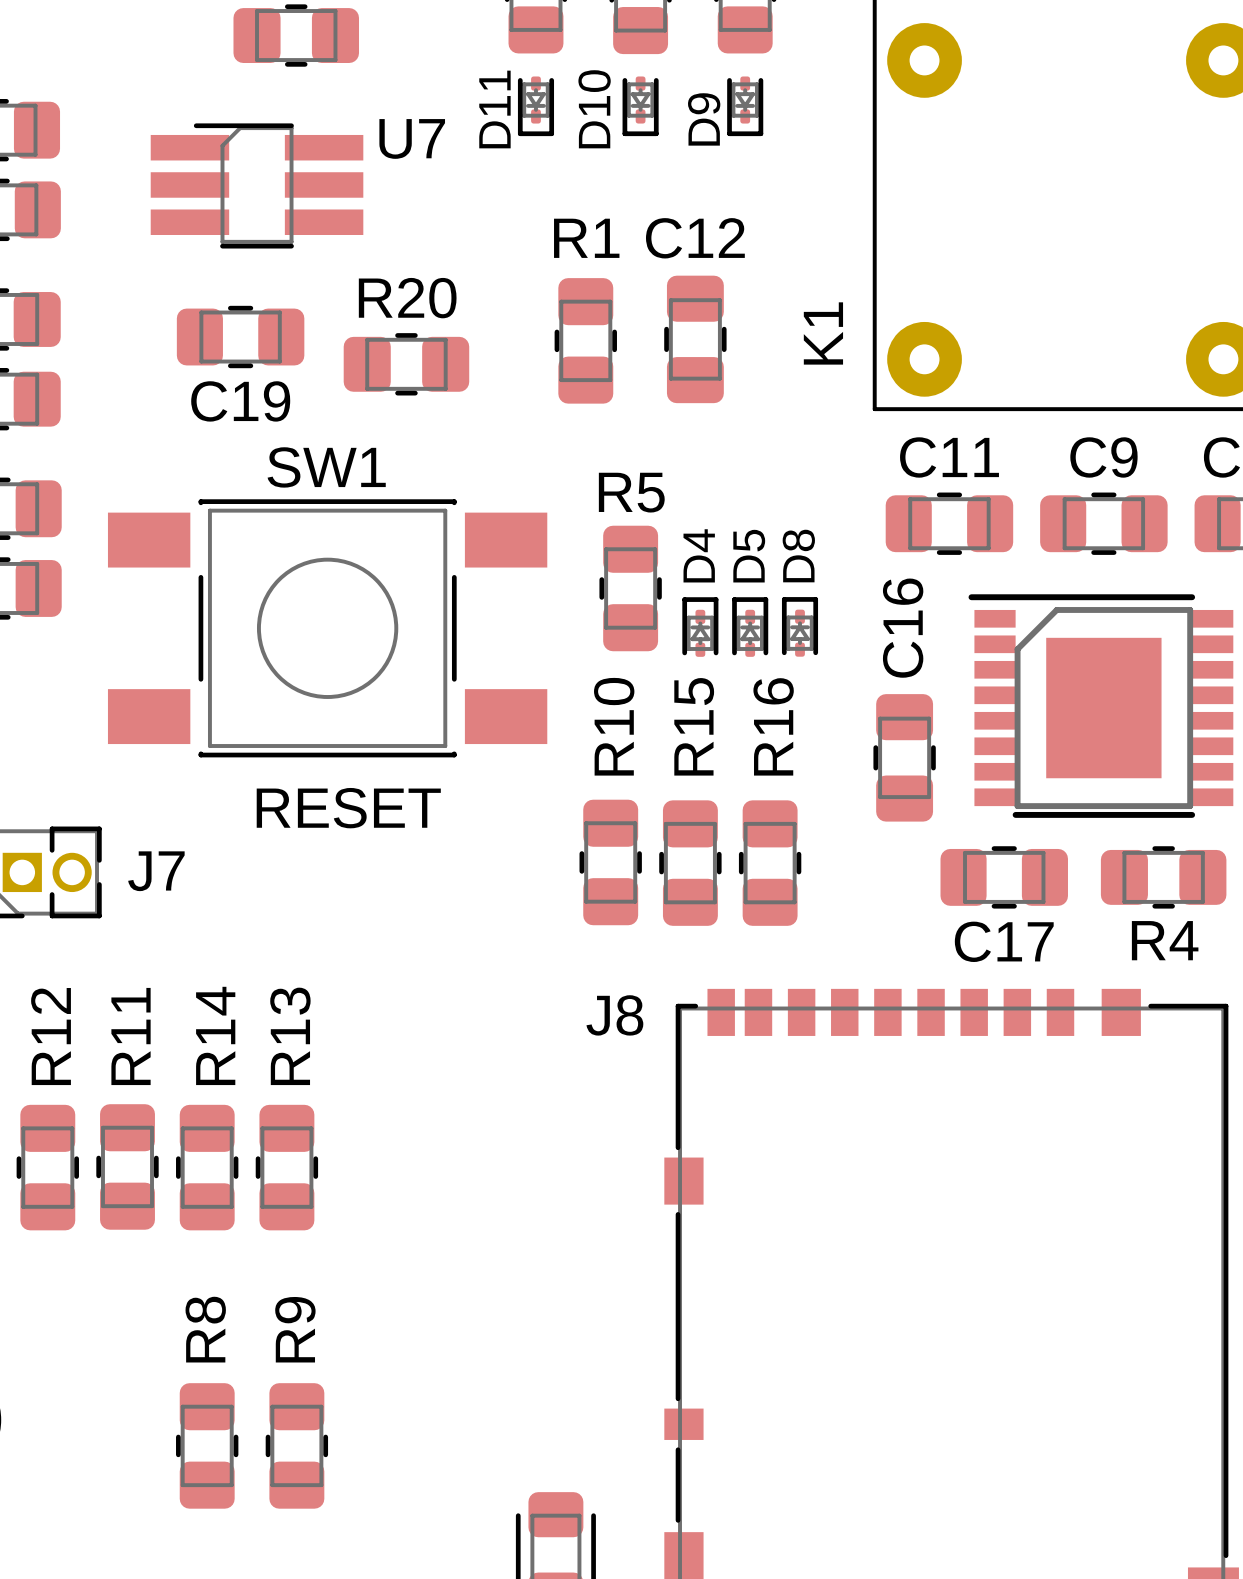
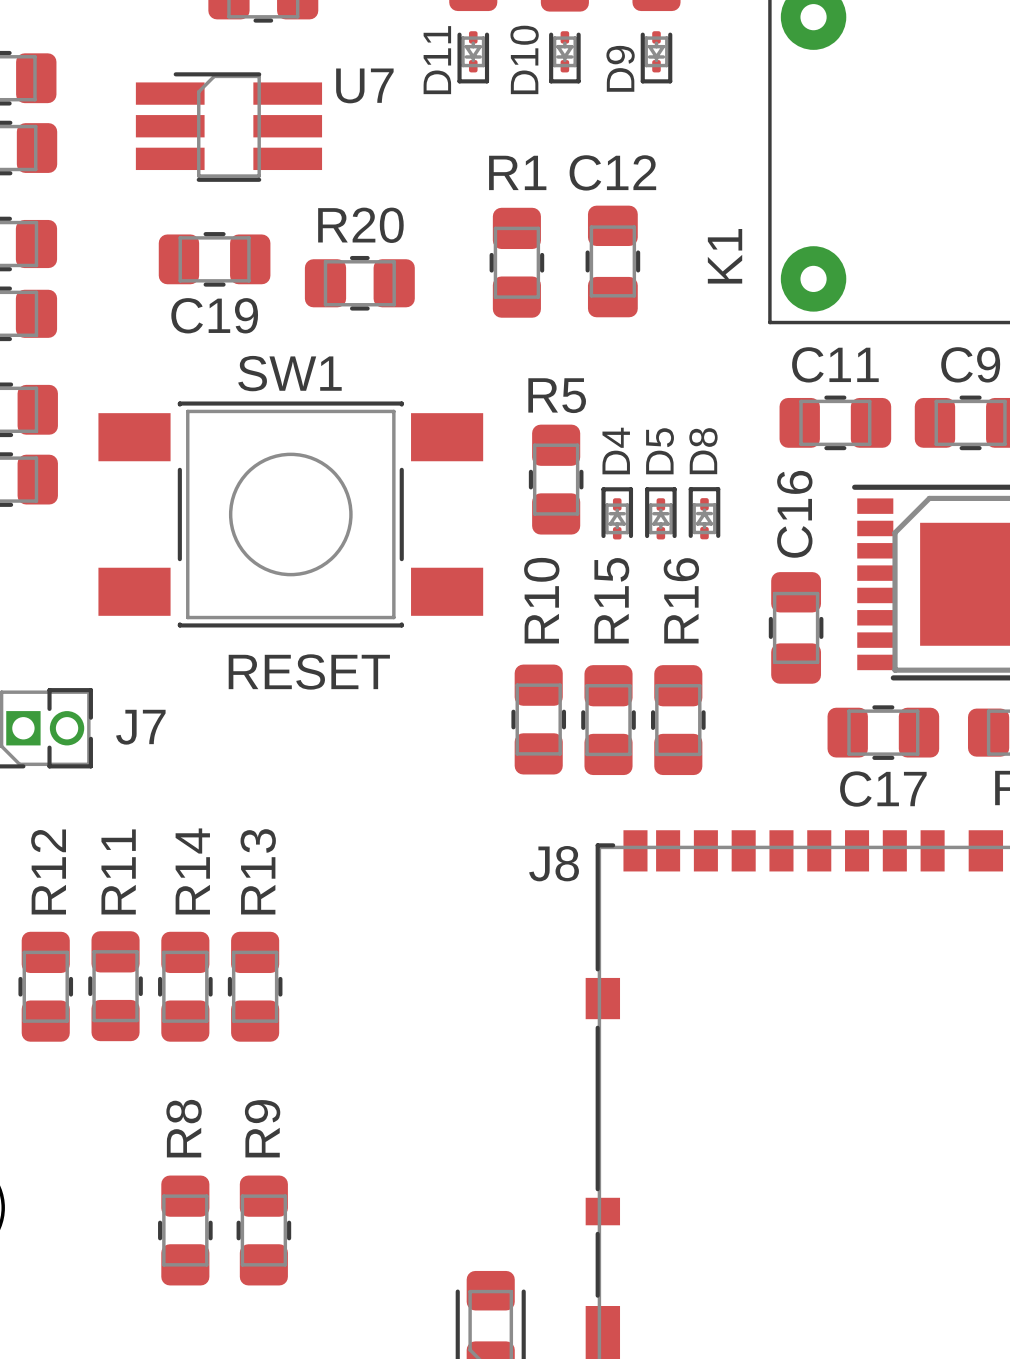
J8 name position: J8 (614, 1015) -> J8 (554, 863)

